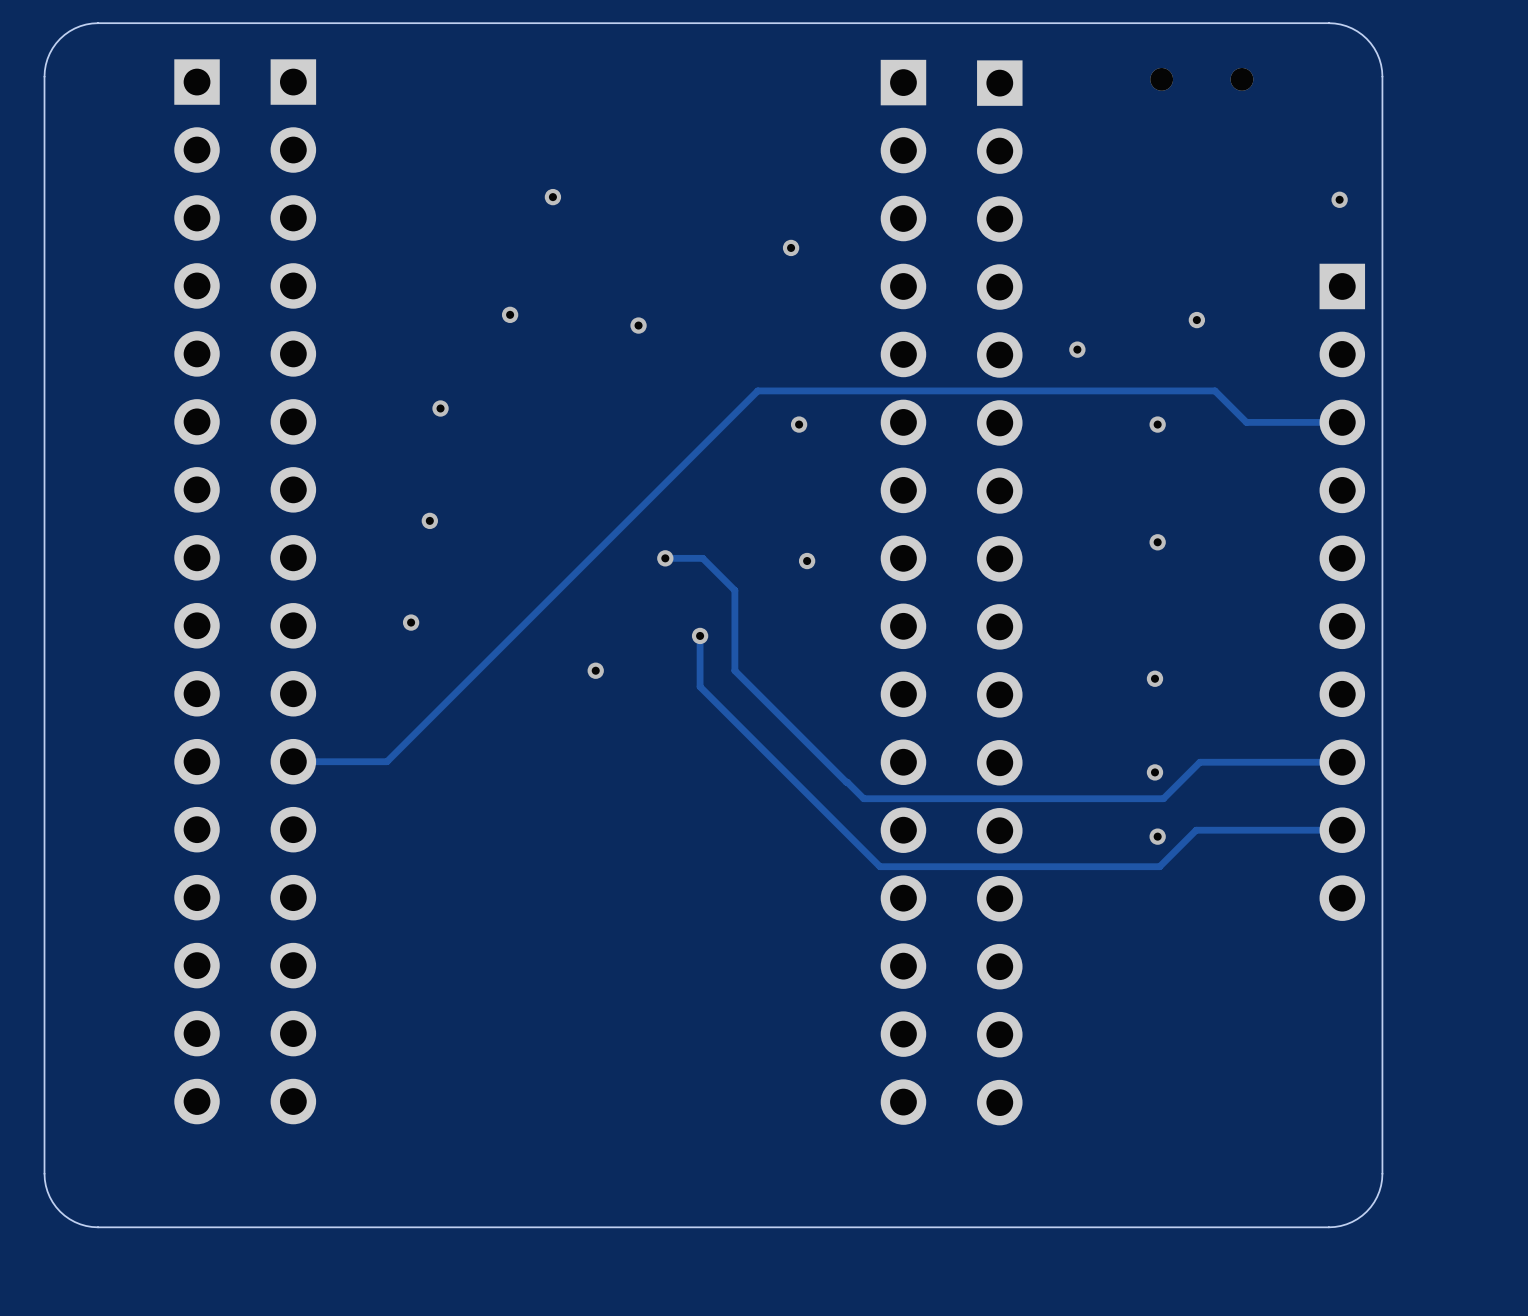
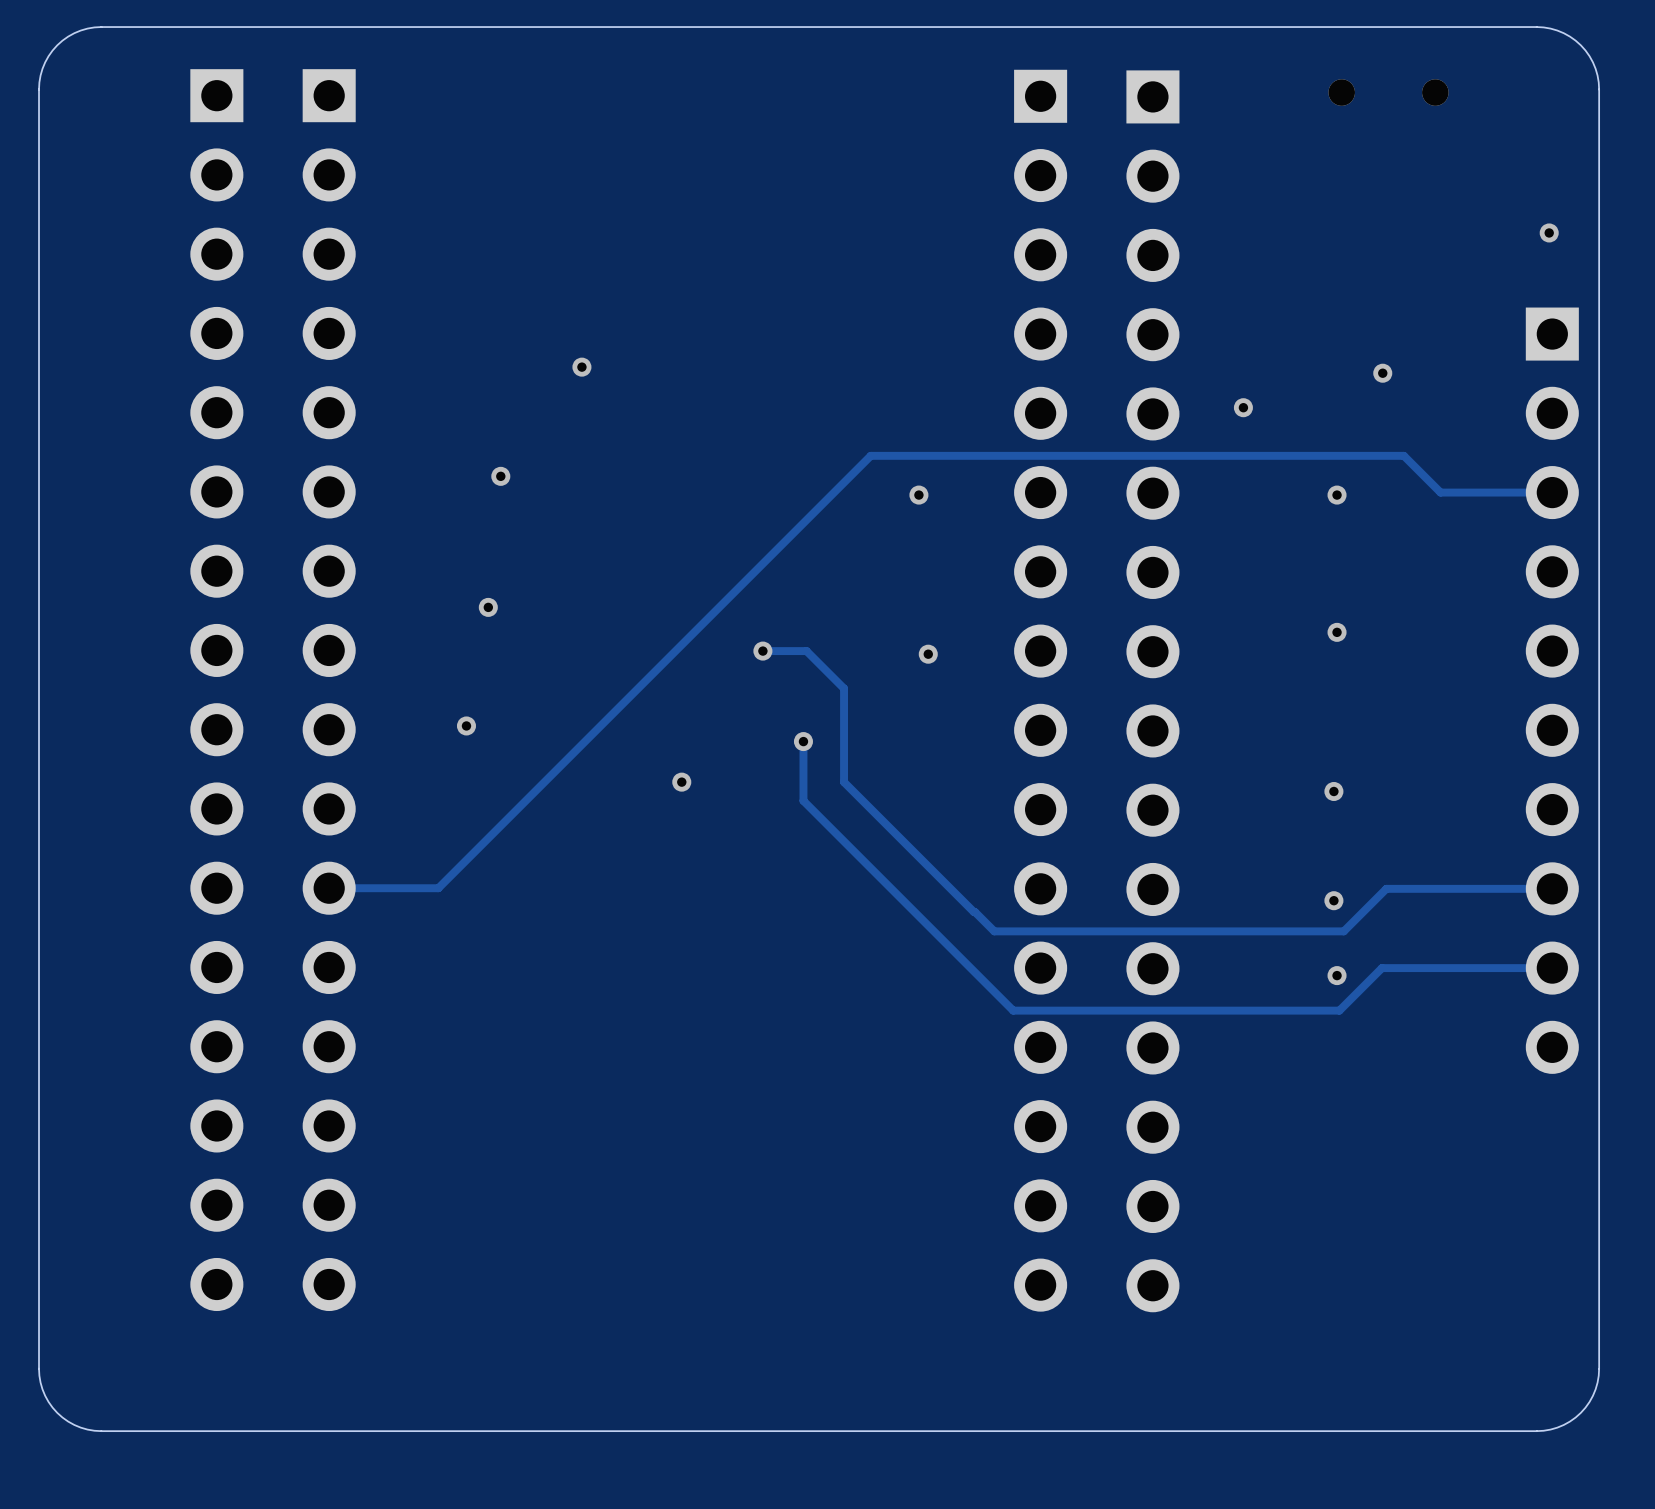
via: (552, 197) -> none
via: (791, 247) -> none
via: (638, 325) -> none

